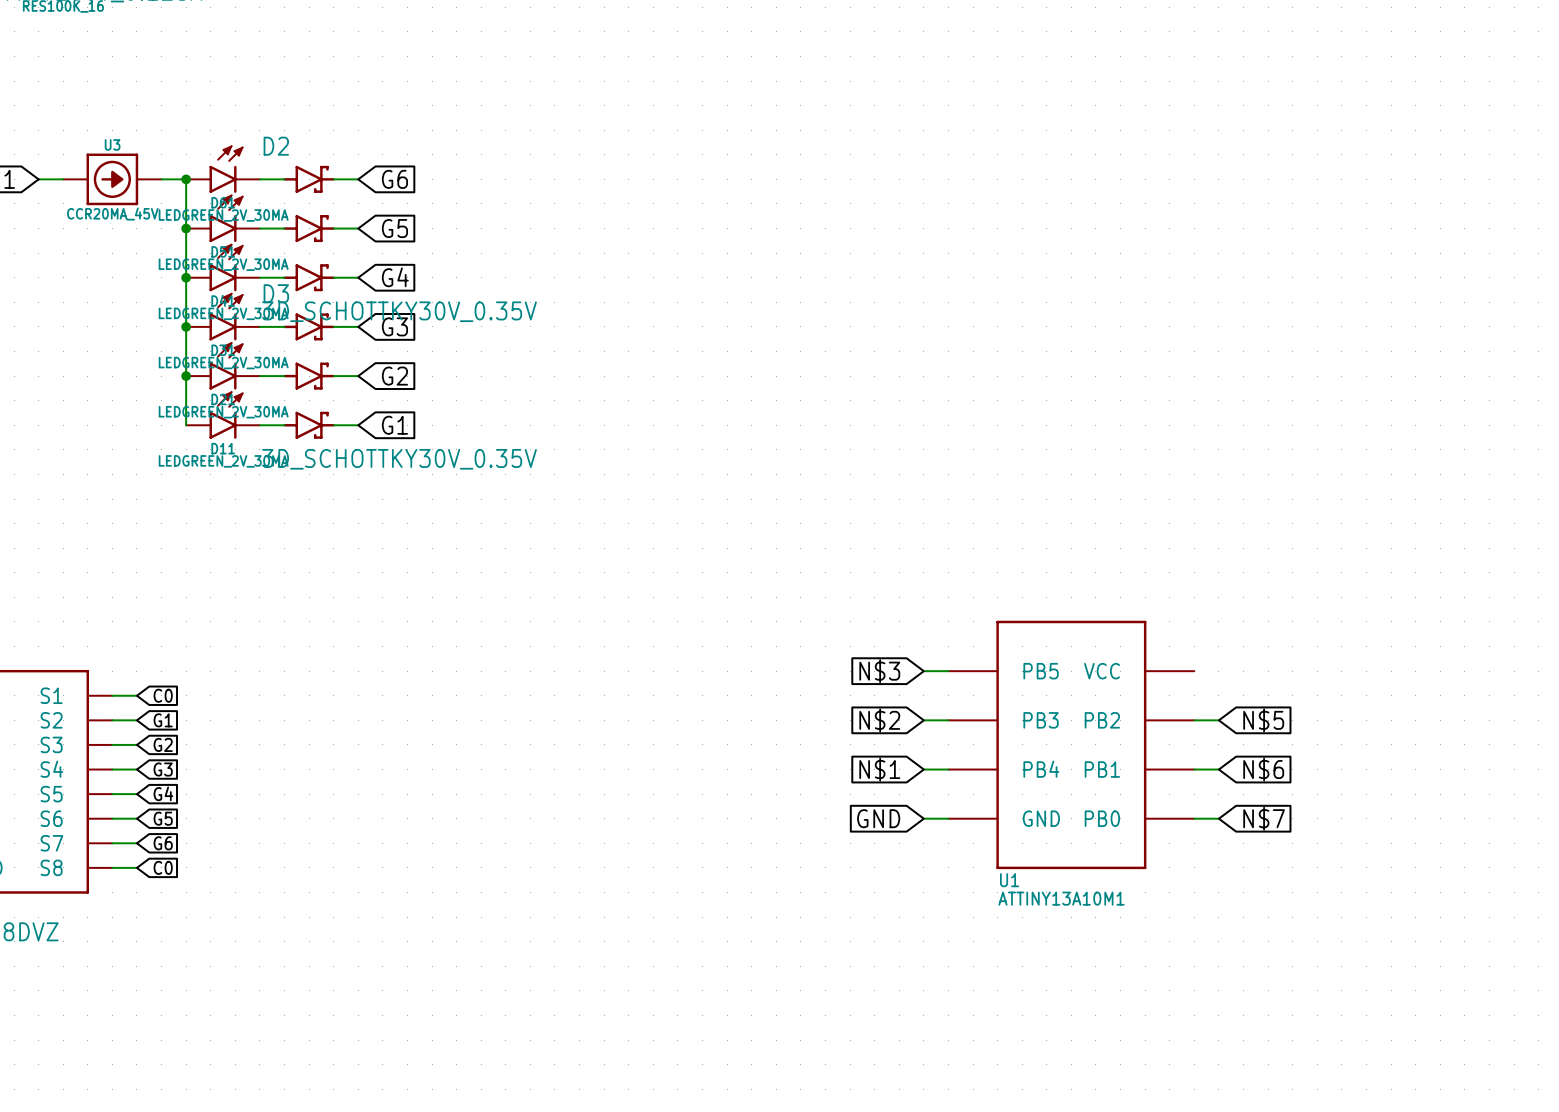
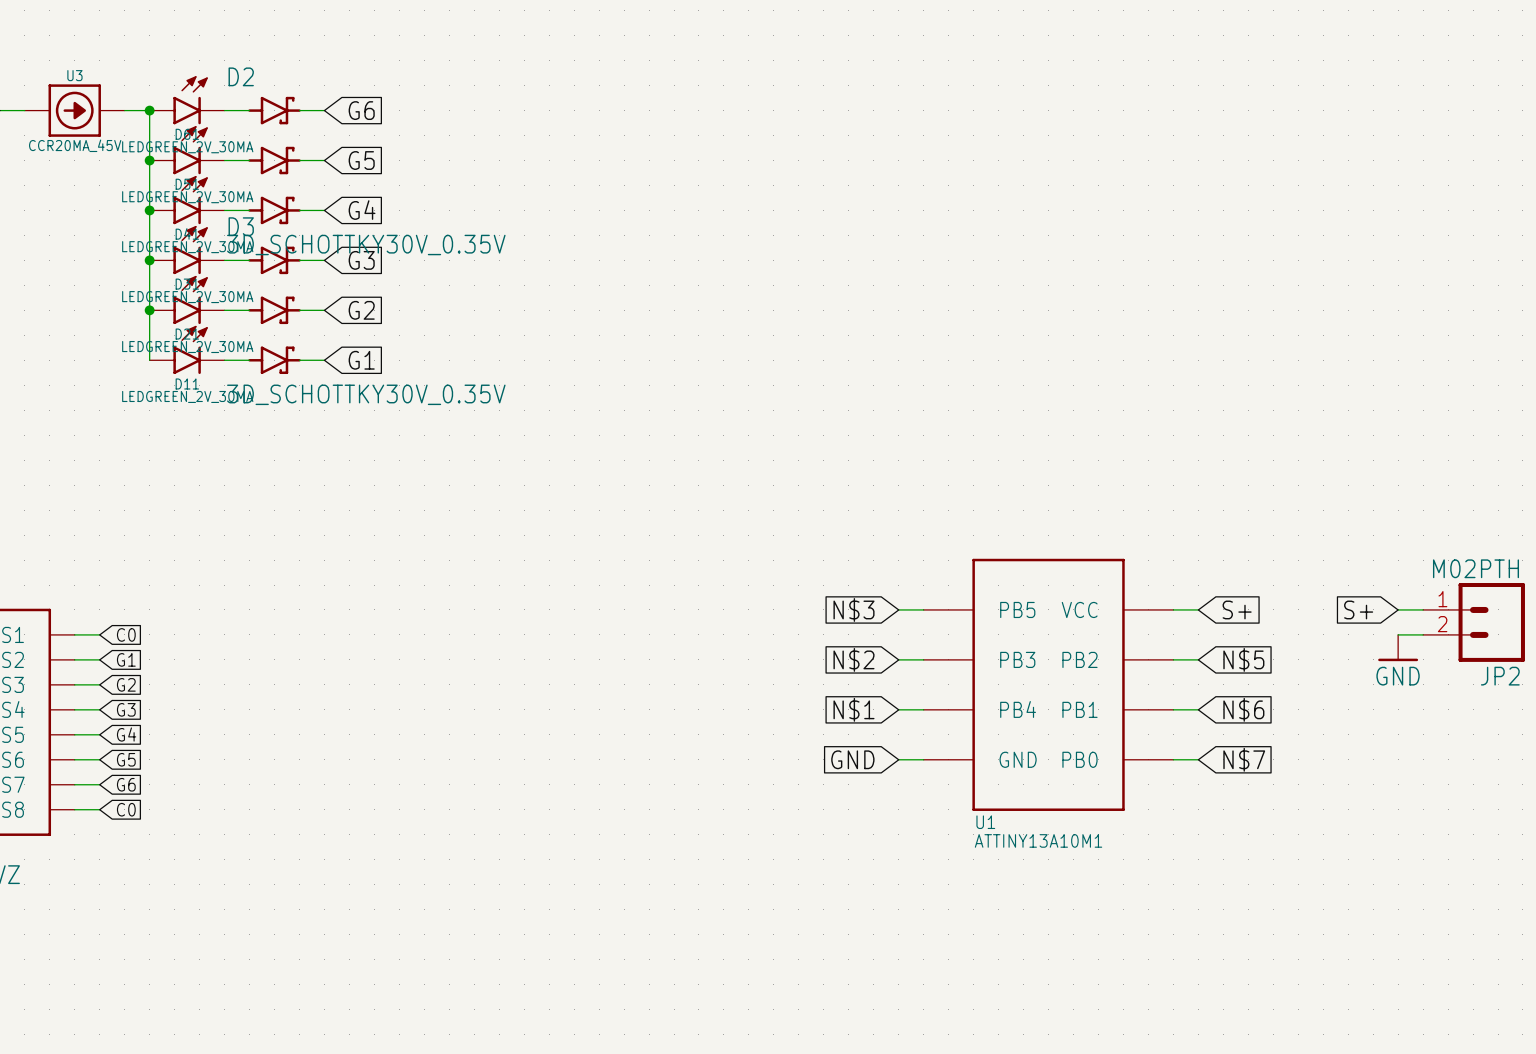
wire: none -> (1173, 609) (1198, 609)
global label: none -> S+ (1237, 609)
global label: none -> S+ (1358, 609)
wire: none -> (1398, 609) (1423, 609)
JP2: none -> M02PTH (1474, 622)
wire: none -> (1398, 634) (1423, 634)
power symbol: none -> GND (1398, 648)

